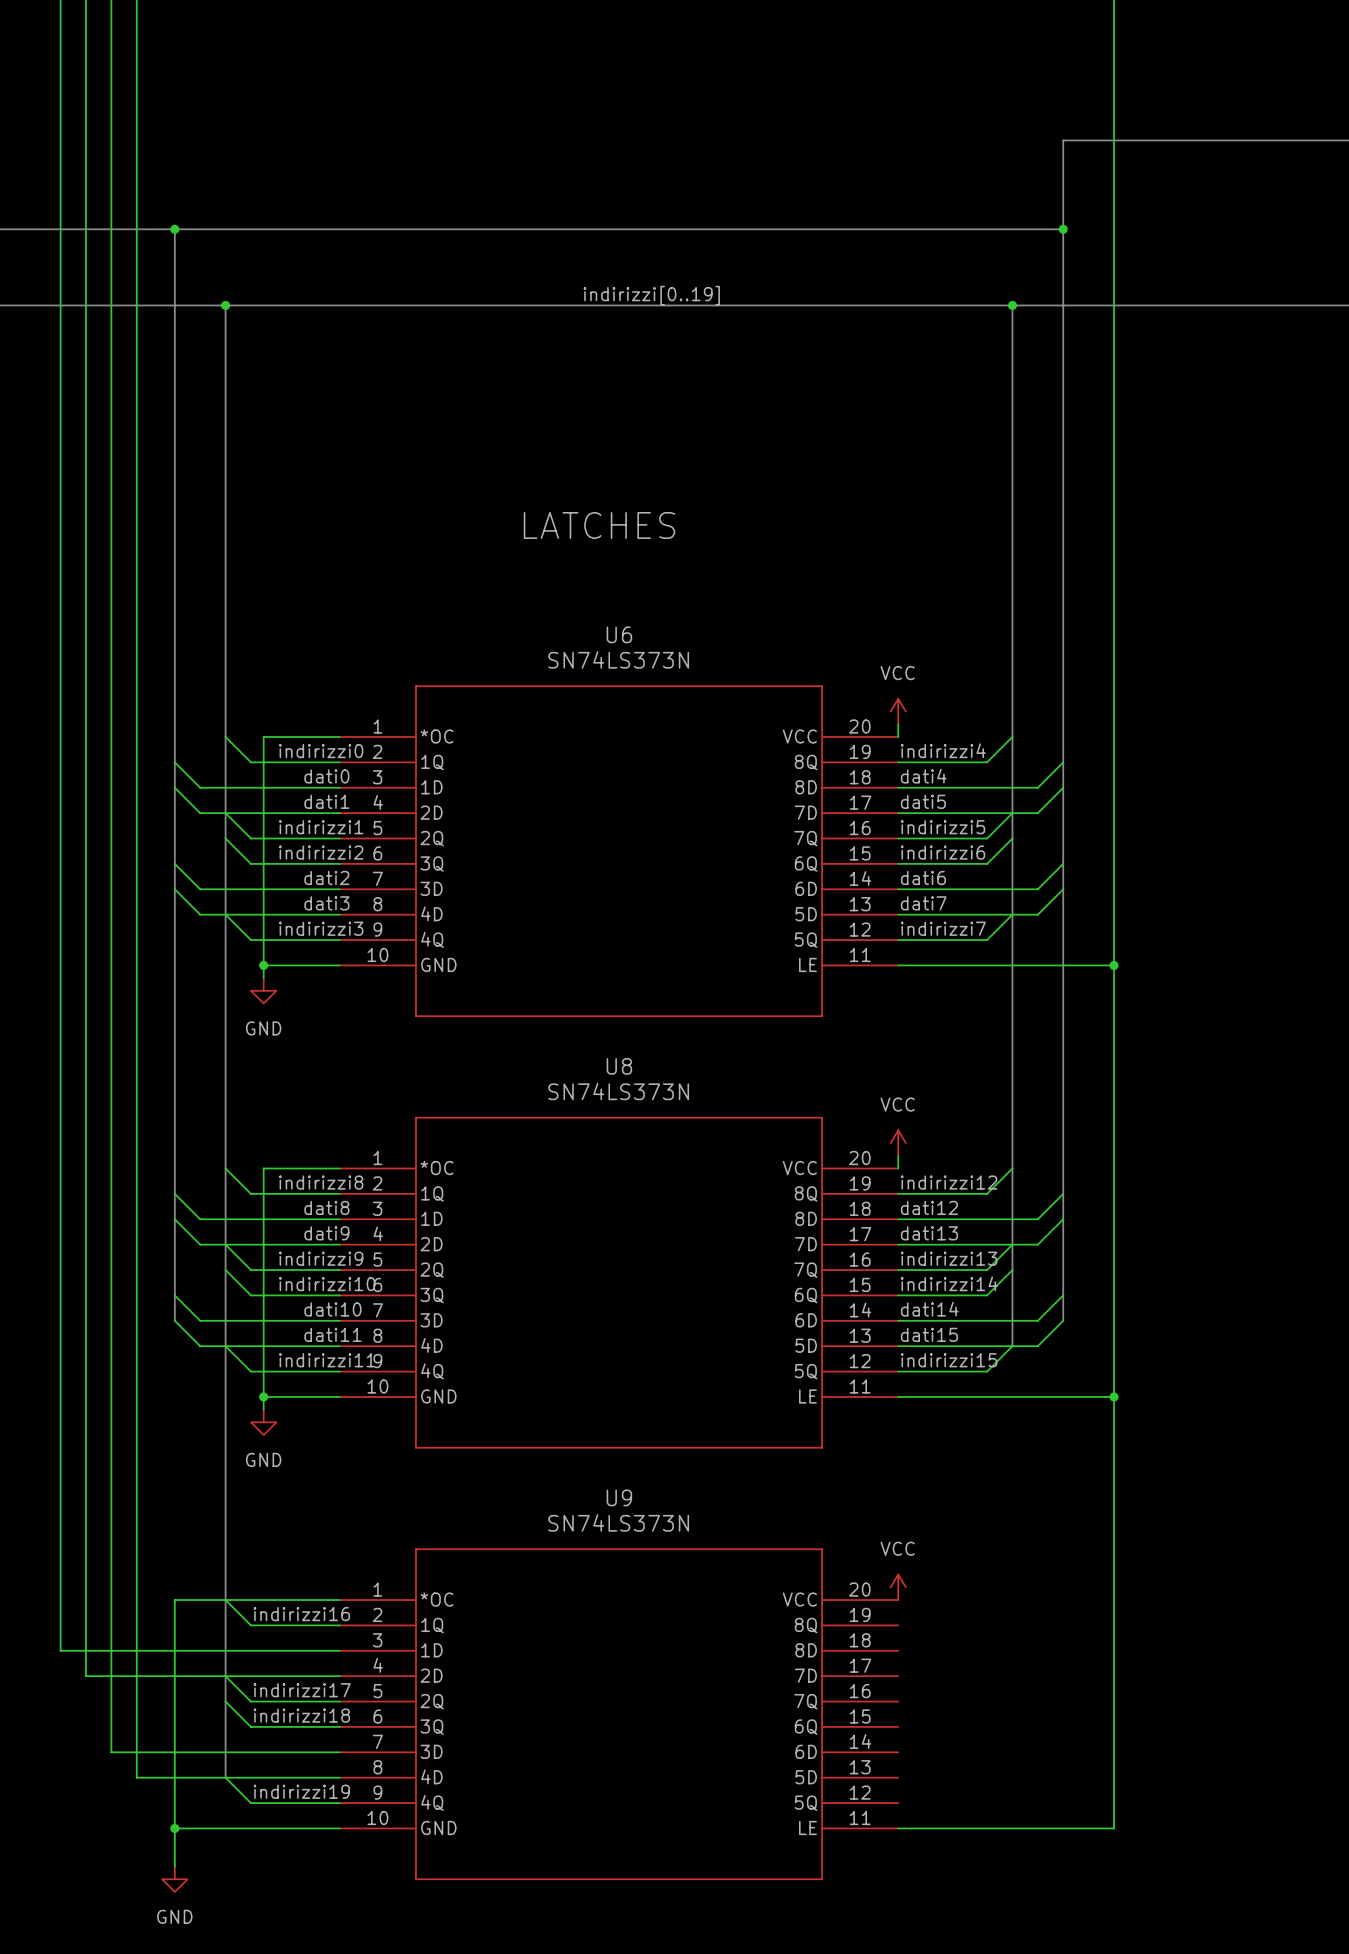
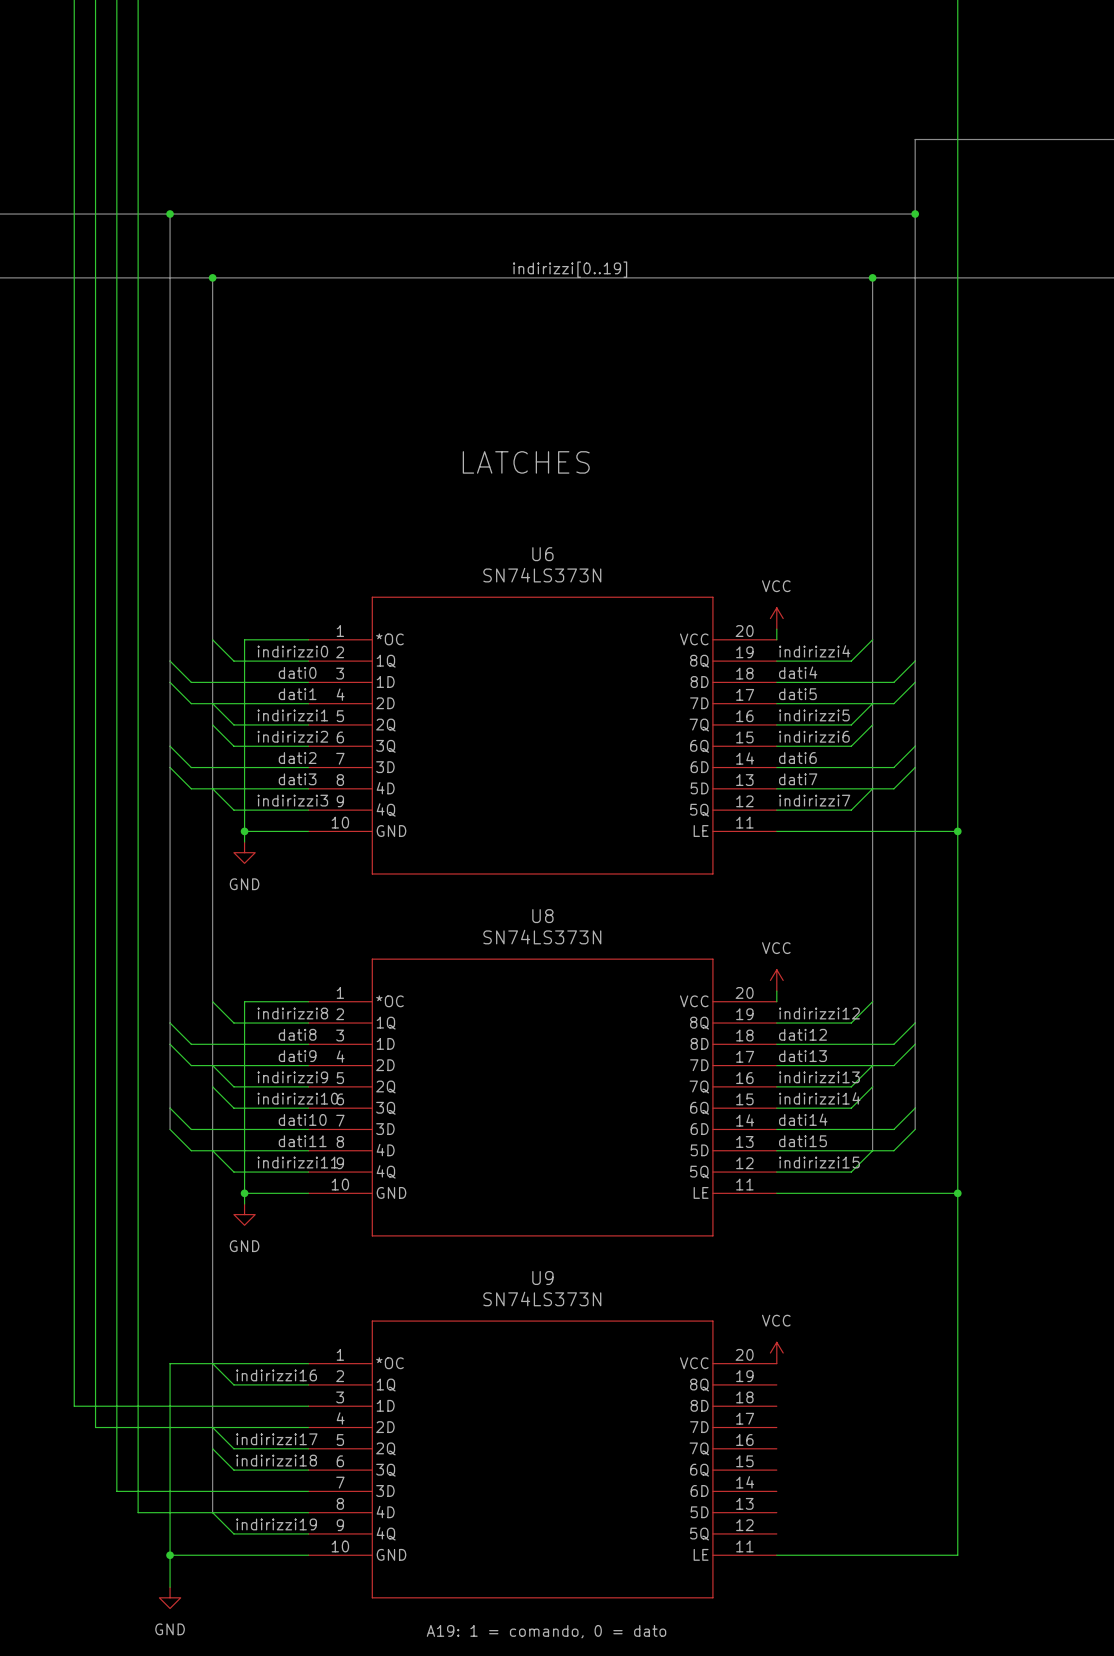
label: none -> A19: 1 = comando, 0 = dato (546, 1631)

